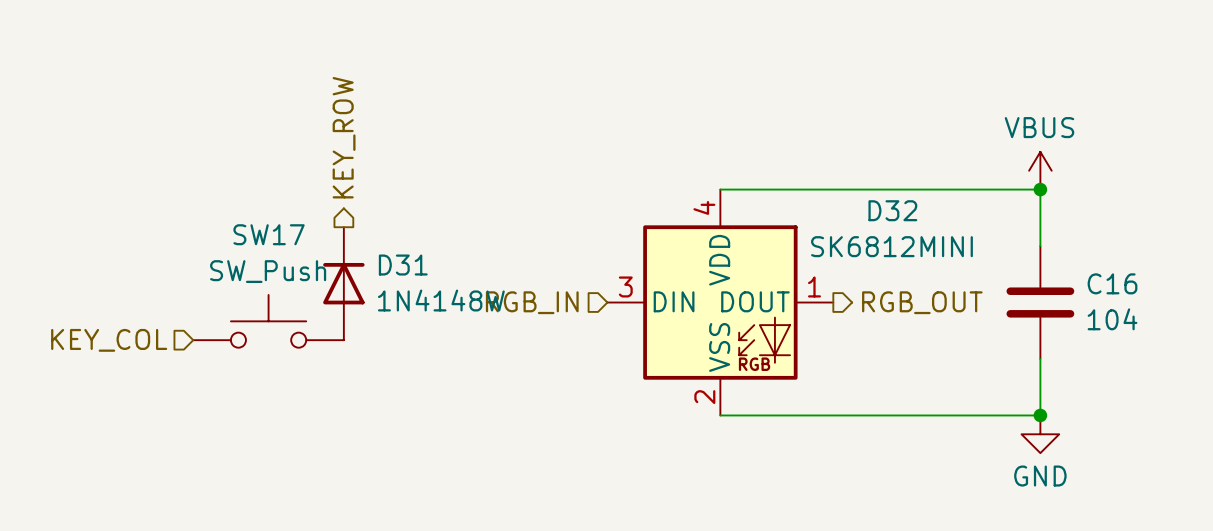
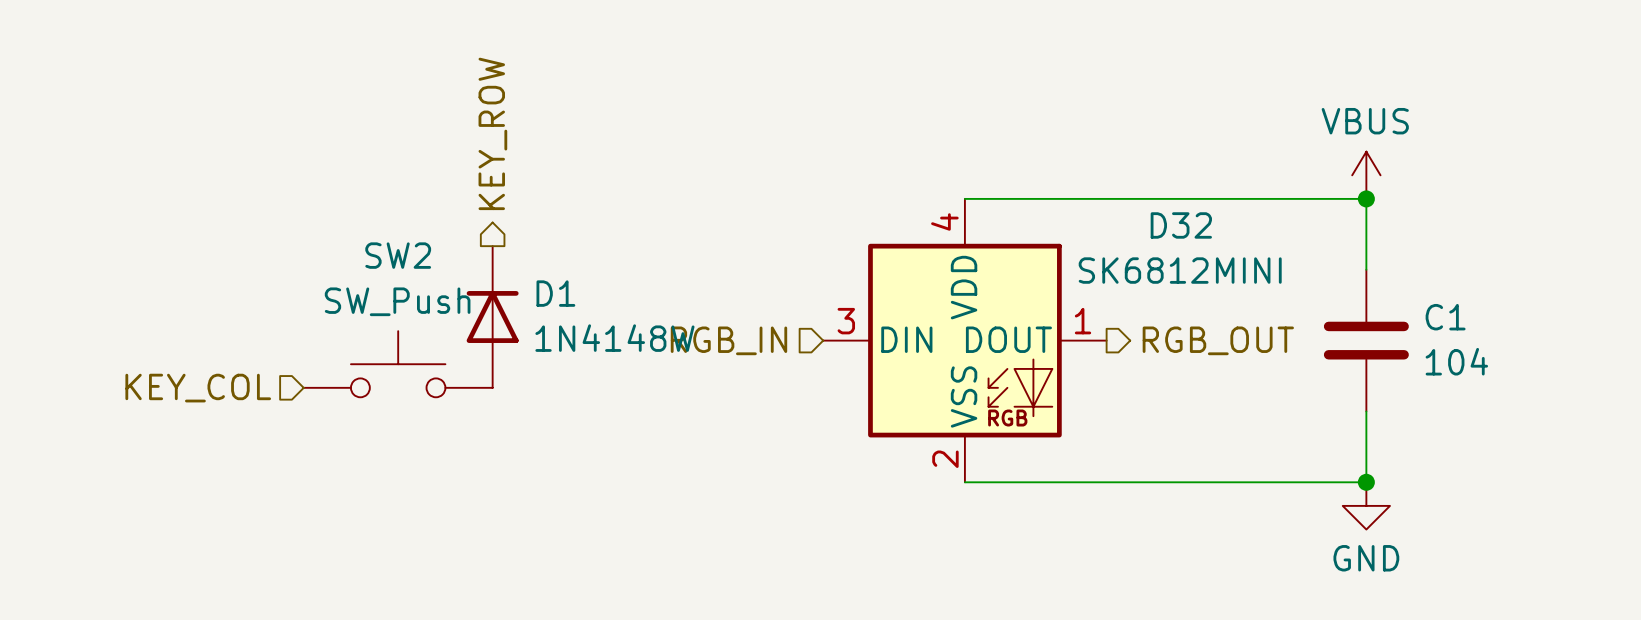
SW17 name: SW17 (269, 234) -> SW2 (398, 255)
D31 name: D31 (403, 265) -> D1 (555, 293)
C16 name: C16 (1112, 283) -> C1 (1445, 317)

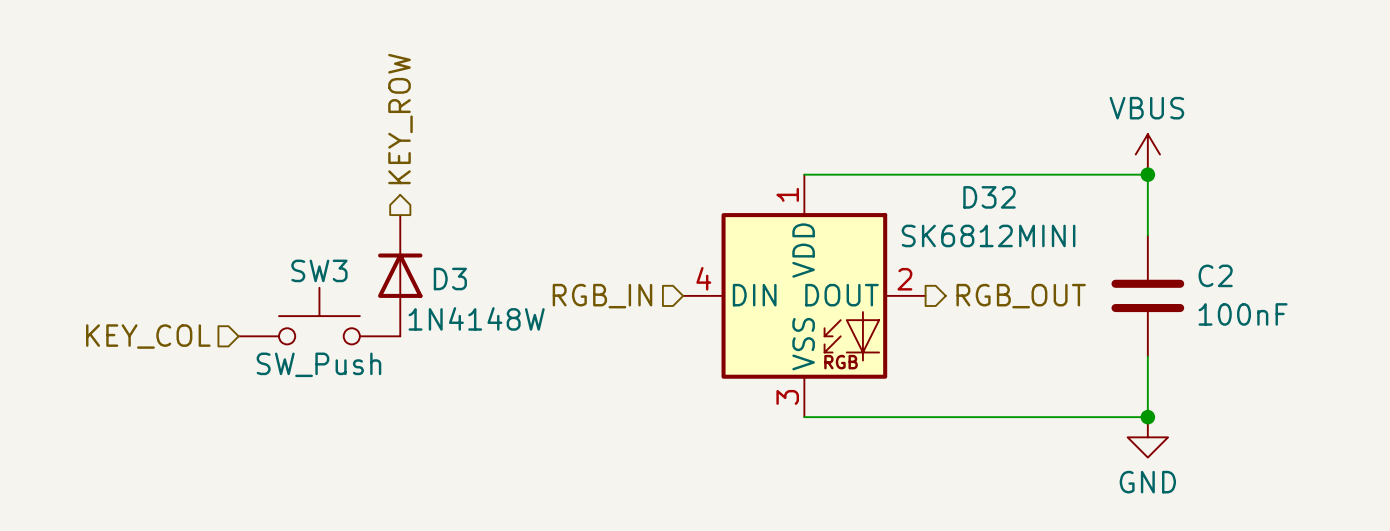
D32 pin number: 4 (944, 221) -> 1 (787, 194)
SW2 name: SW2 (398, 255) -> SW3 (319, 270)
D1 name: D1 (555, 293) -> D3 (450, 278)
SW2 value position: SW_Push (397, 301) -> SW_Push (318, 364)
C1 name: C1 (1445, 317) -> C2 (1215, 275)
D32 pin number: 3 (846, 321) -> 4 (703, 278)
D32 pin number: 1 (1083, 321) -> 2 (904, 279)
D1 value position: 1N4148W (614, 338) -> 1N4148W (476, 318)
C1 value: 104 (1456, 361) -> 100nF (1243, 314)
D32 pin number: 2 (945, 459) -> 3 (787, 397)

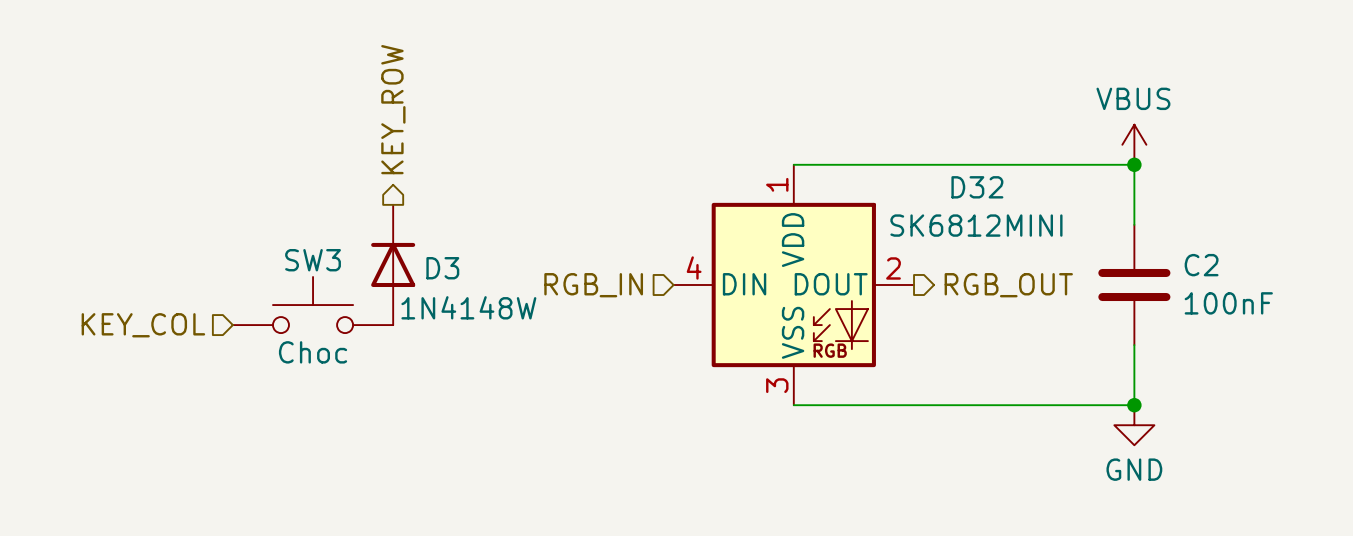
SW3 value: SW_Push (318, 364) -> Choc (313, 352)

